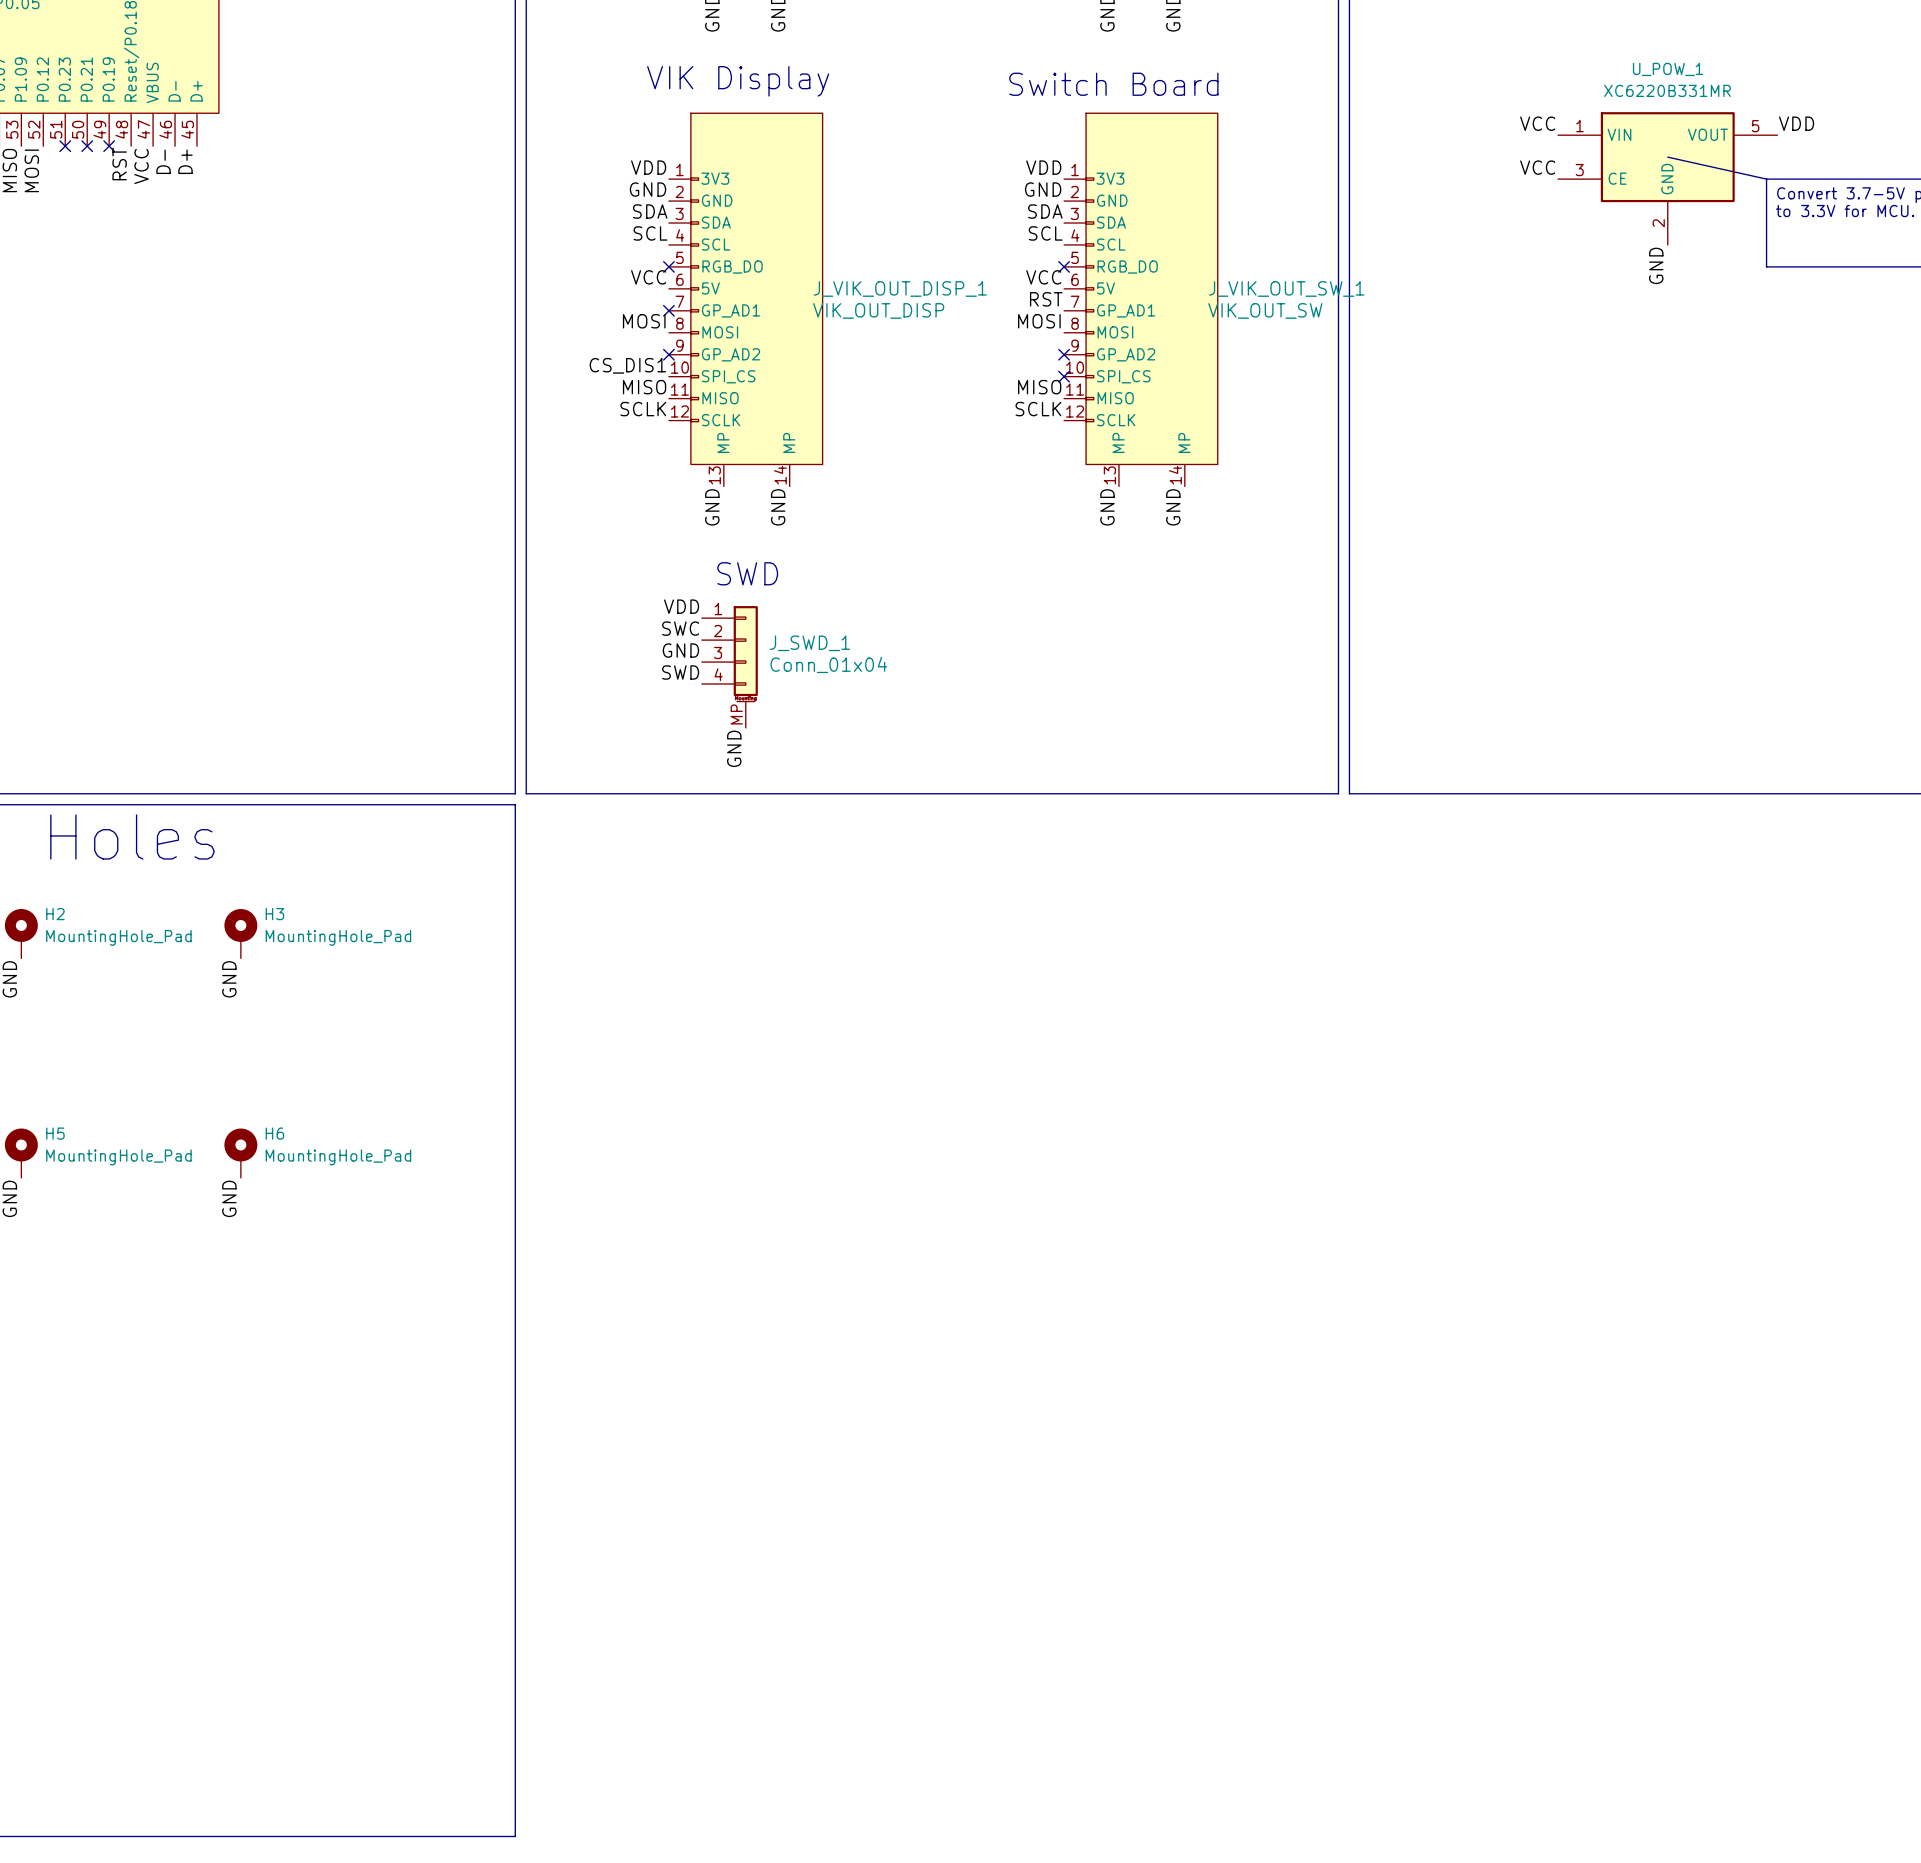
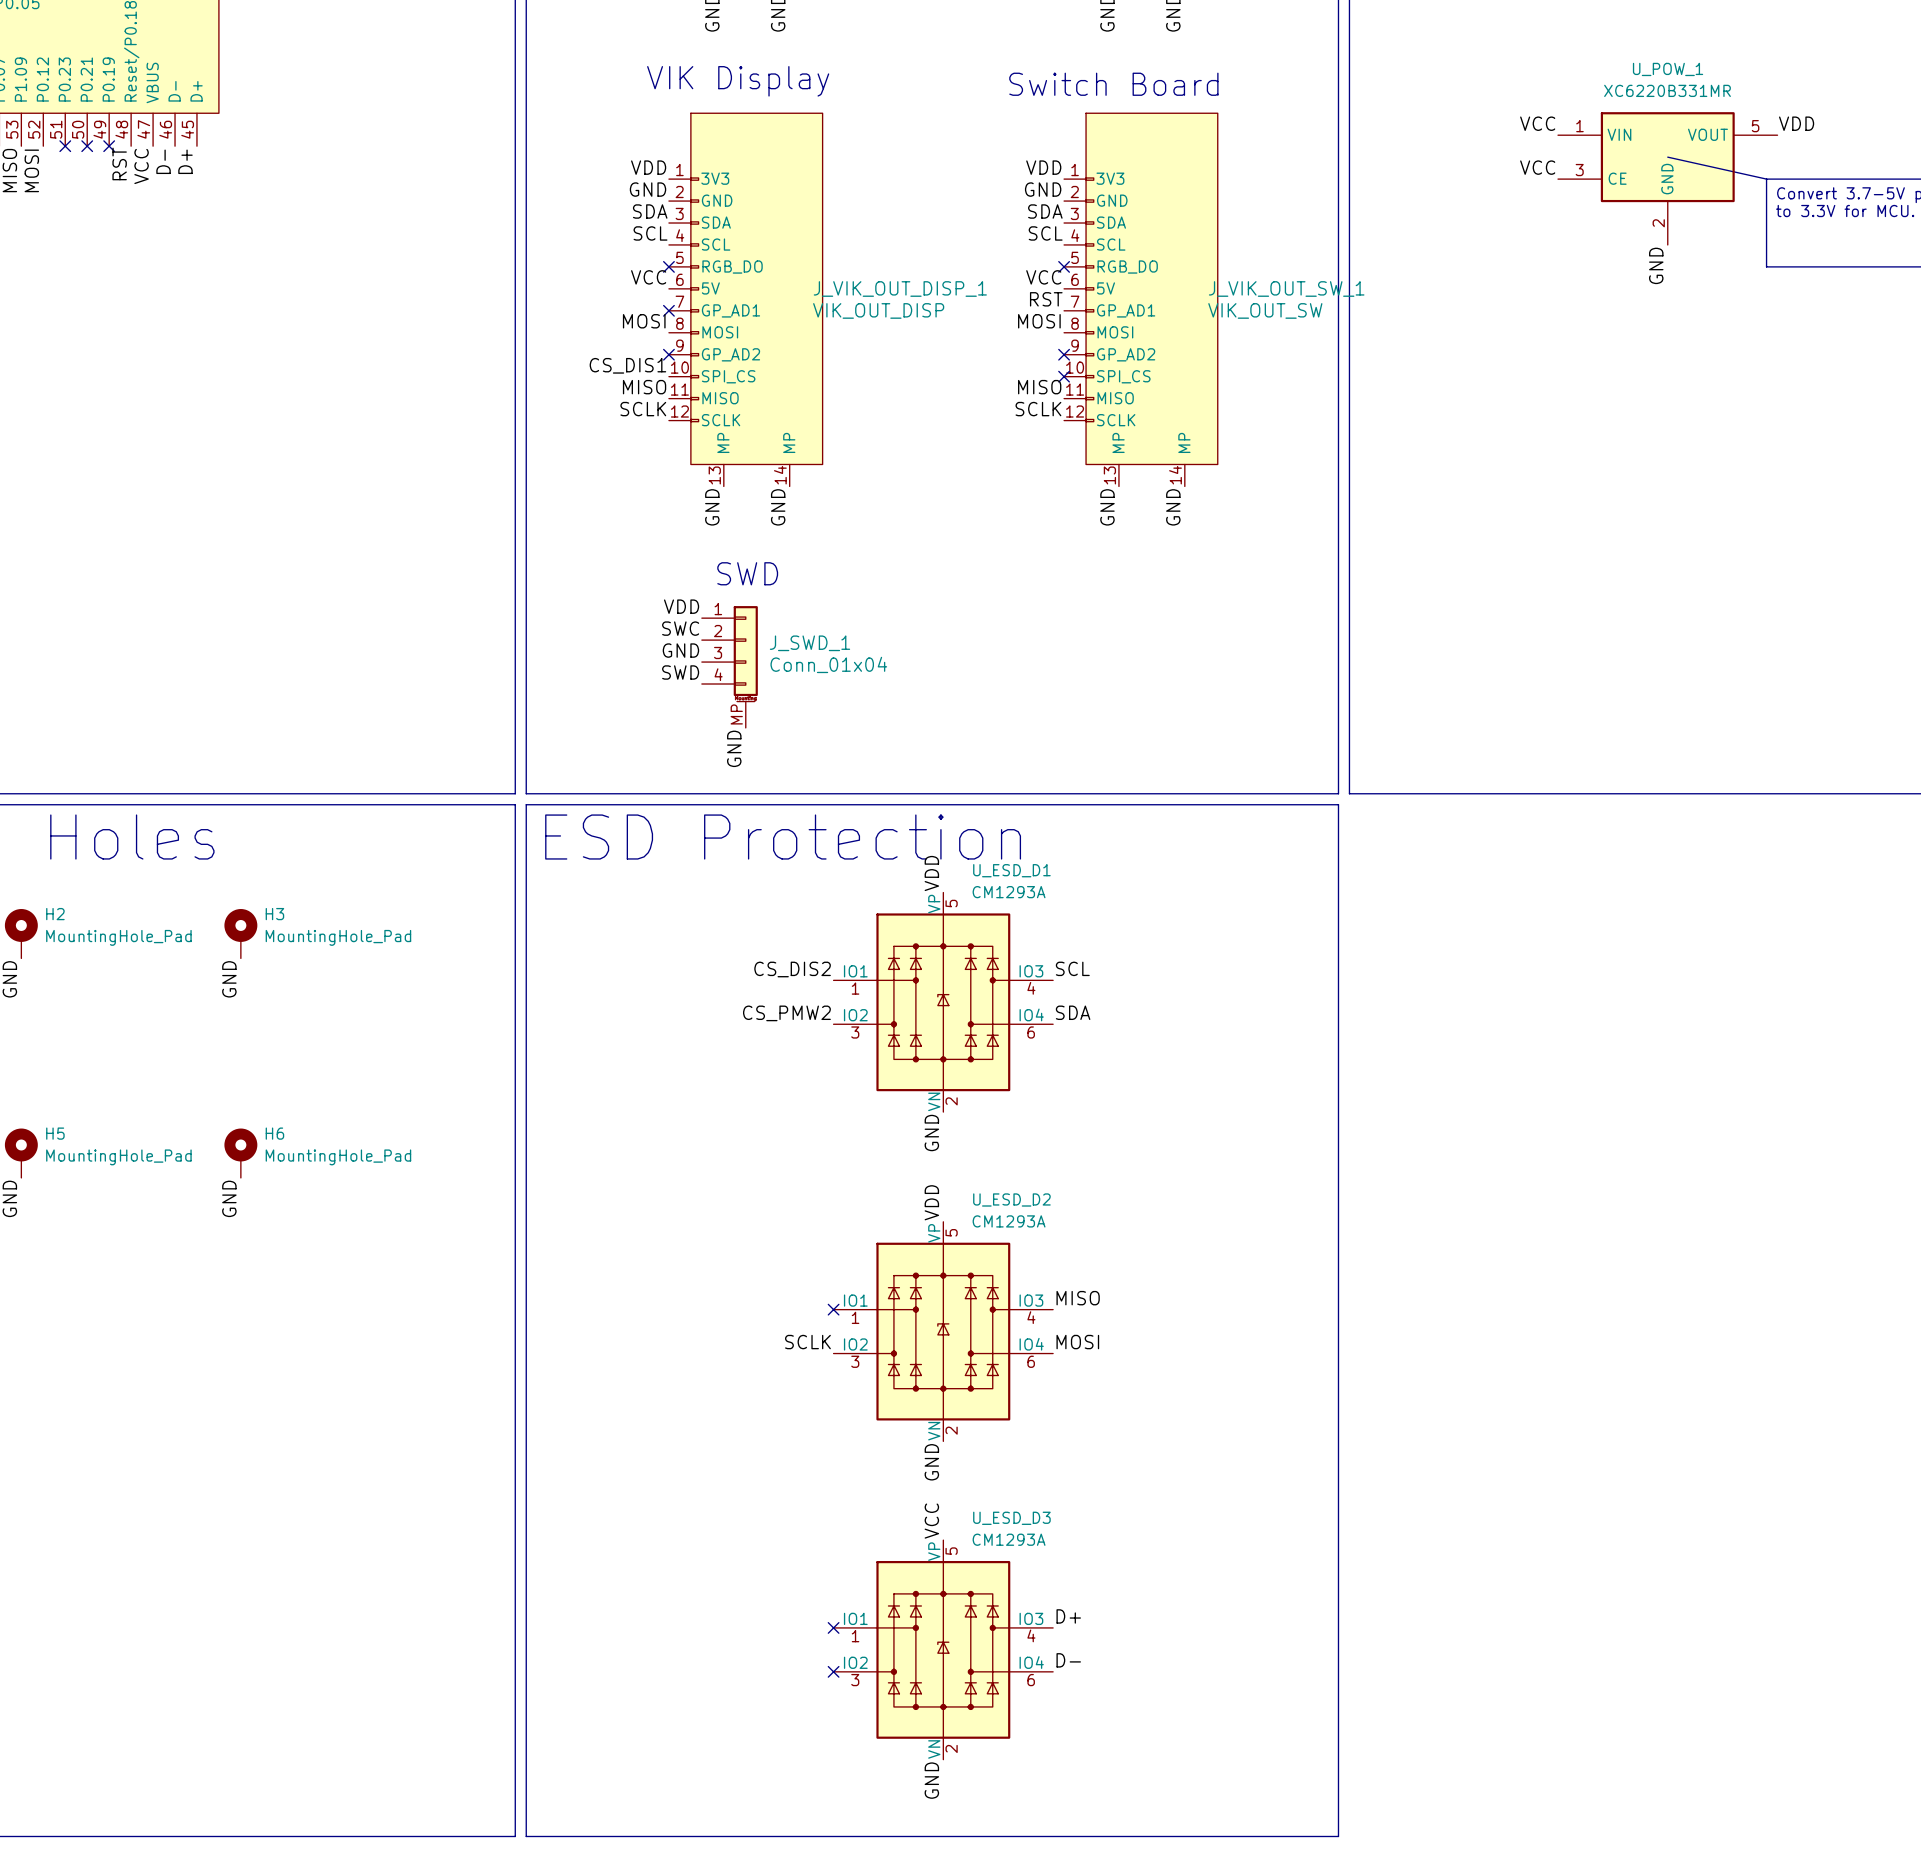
line: none -> (526, 804) (1338, 804) (1338, 1836) (526, 1836) (526, 804)
text: none -> ESD Protection (783, 837)
label: none -> VDD (931, 873)
label: none -> SCL (1072, 968)
label: none -> CS_DIS2 (792, 969)
U_ESD_D1: none -> CM1293A (943, 1002)
label: none -> SDA (1073, 1012)
label: none -> CS_PMW2 (786, 1013)
label: none -> GND (931, 1133)
label: none -> VDD (931, 1202)
label: none -> MISO (1078, 1298)
no-connect mark: none -> (833, 1309)
U_ESD_D2: none -> CM1293A (943, 1331)
label: none -> SCLK (807, 1342)
label: none -> MOSI (1077, 1342)
label: none -> GND (931, 1462)
label: none -> VCC (931, 1521)
label: none -> D+ (1068, 1616)
no-connect mark: none -> (833, 1627)
U_ESD_D3: none -> CM1293A (943, 1649)
label: none -> D- (1068, 1660)
no-connect mark: none -> (833, 1671)
label: none -> GND (931, 1780)

